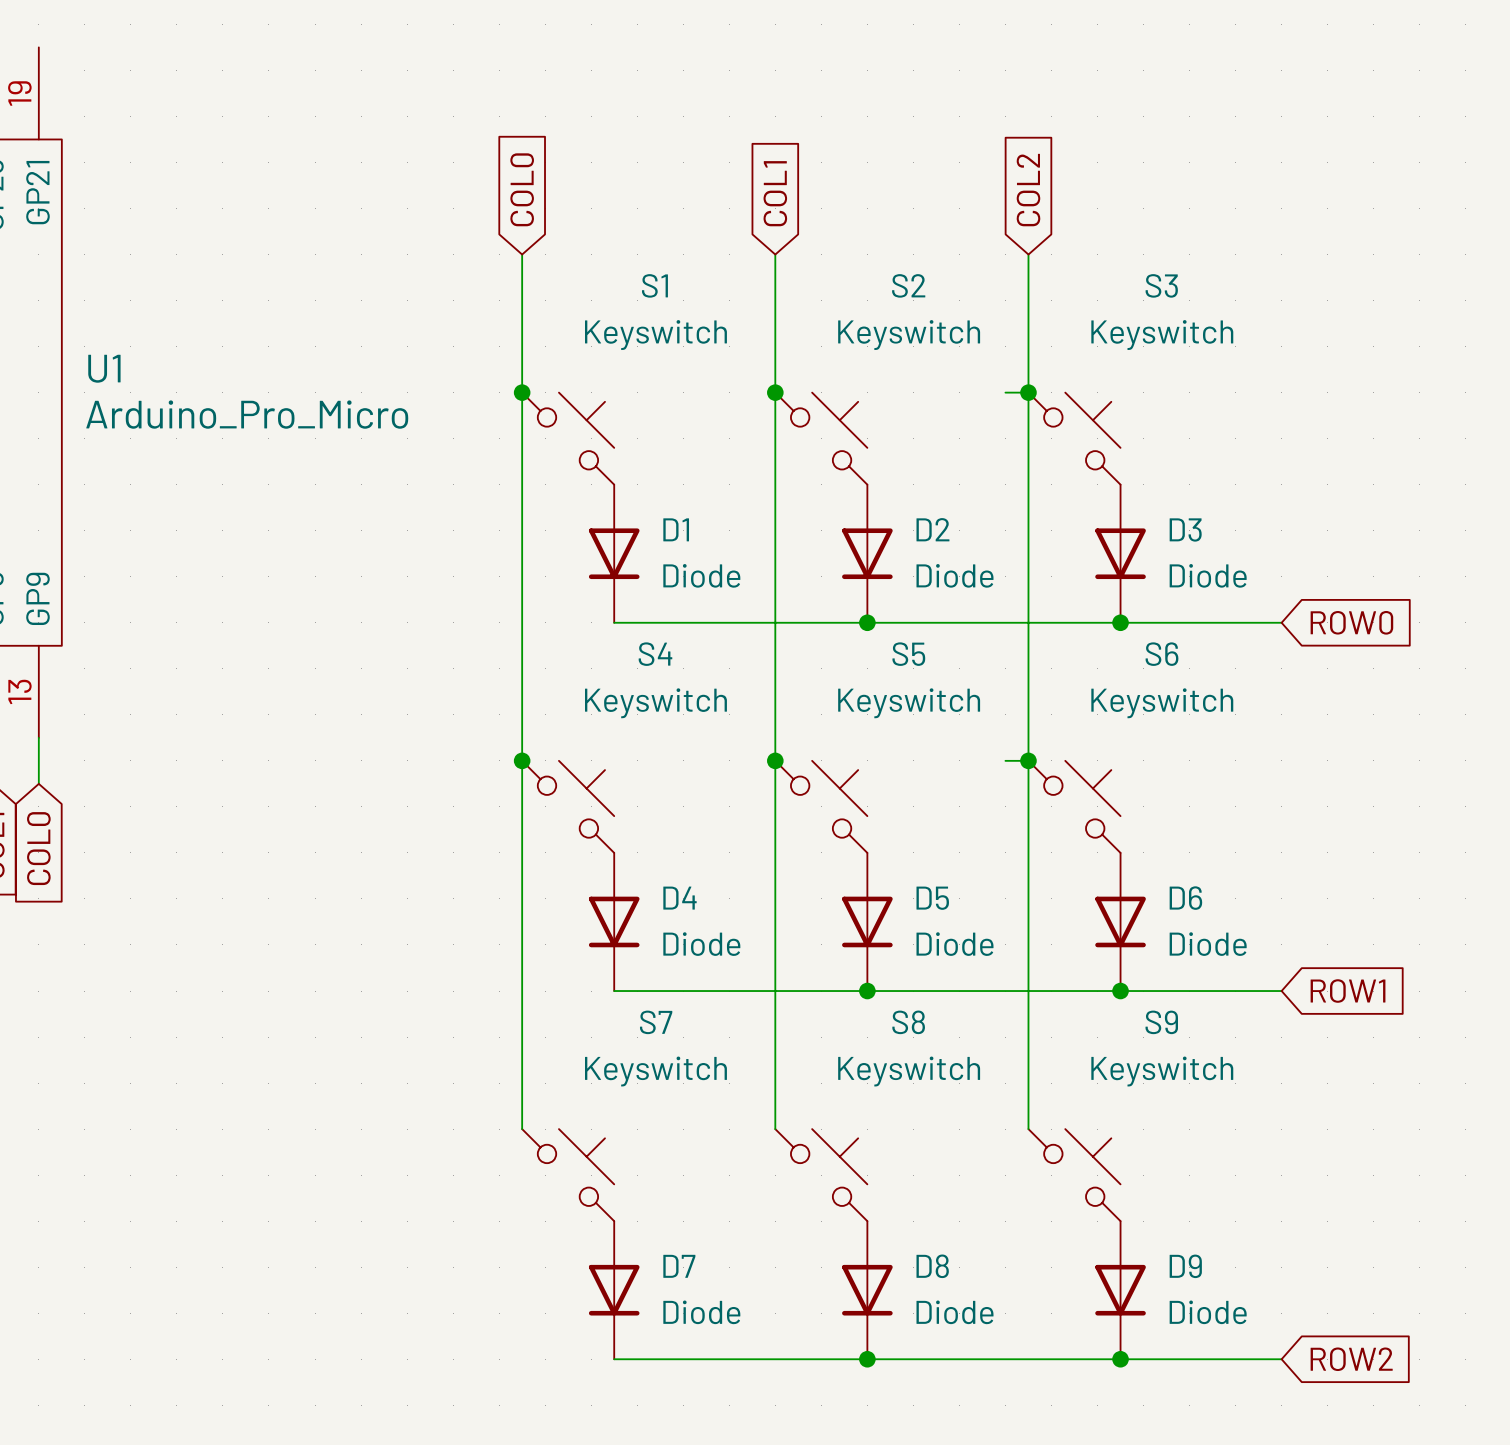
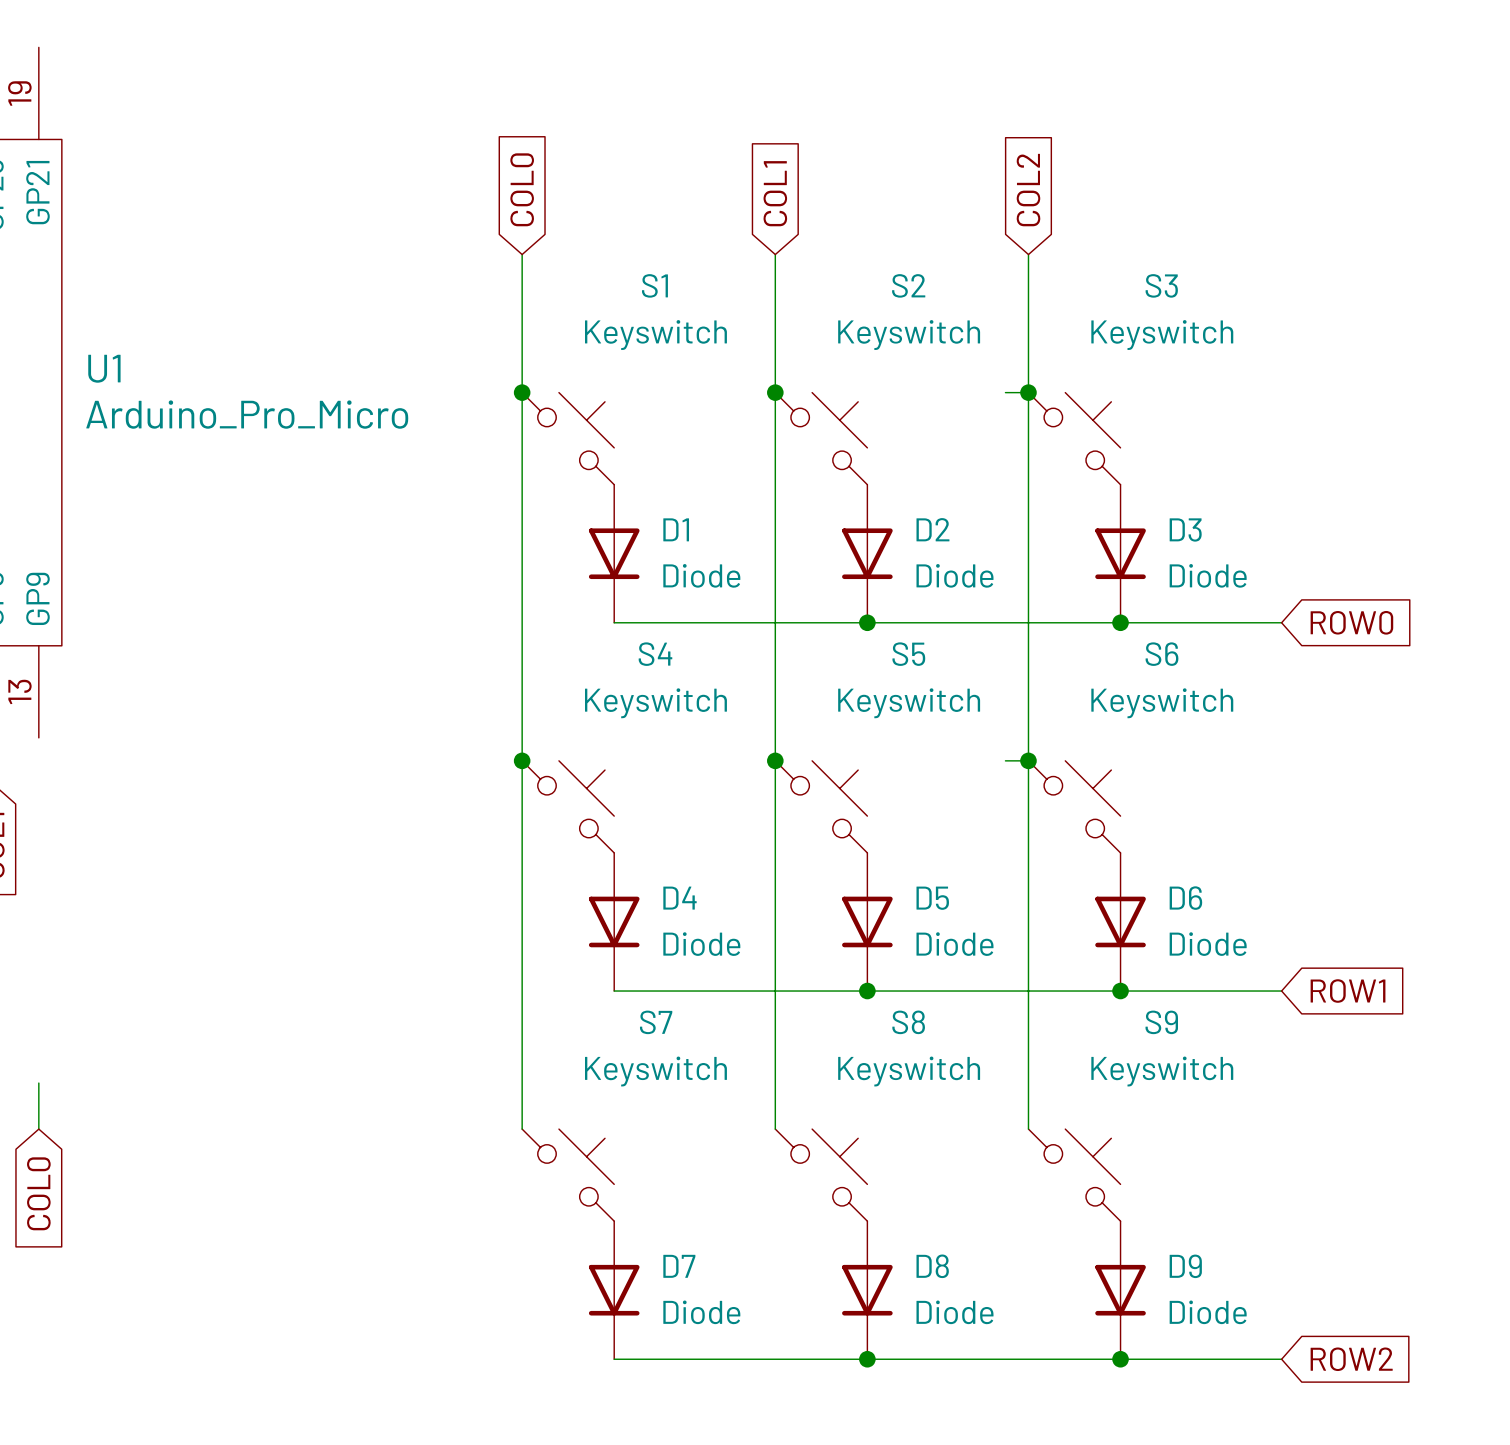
wire: (38, 737) (38, 783) -> (38, 1083) (38, 1129)
global label position: COL0 (38, 848) -> COL0 (38, 1193)

